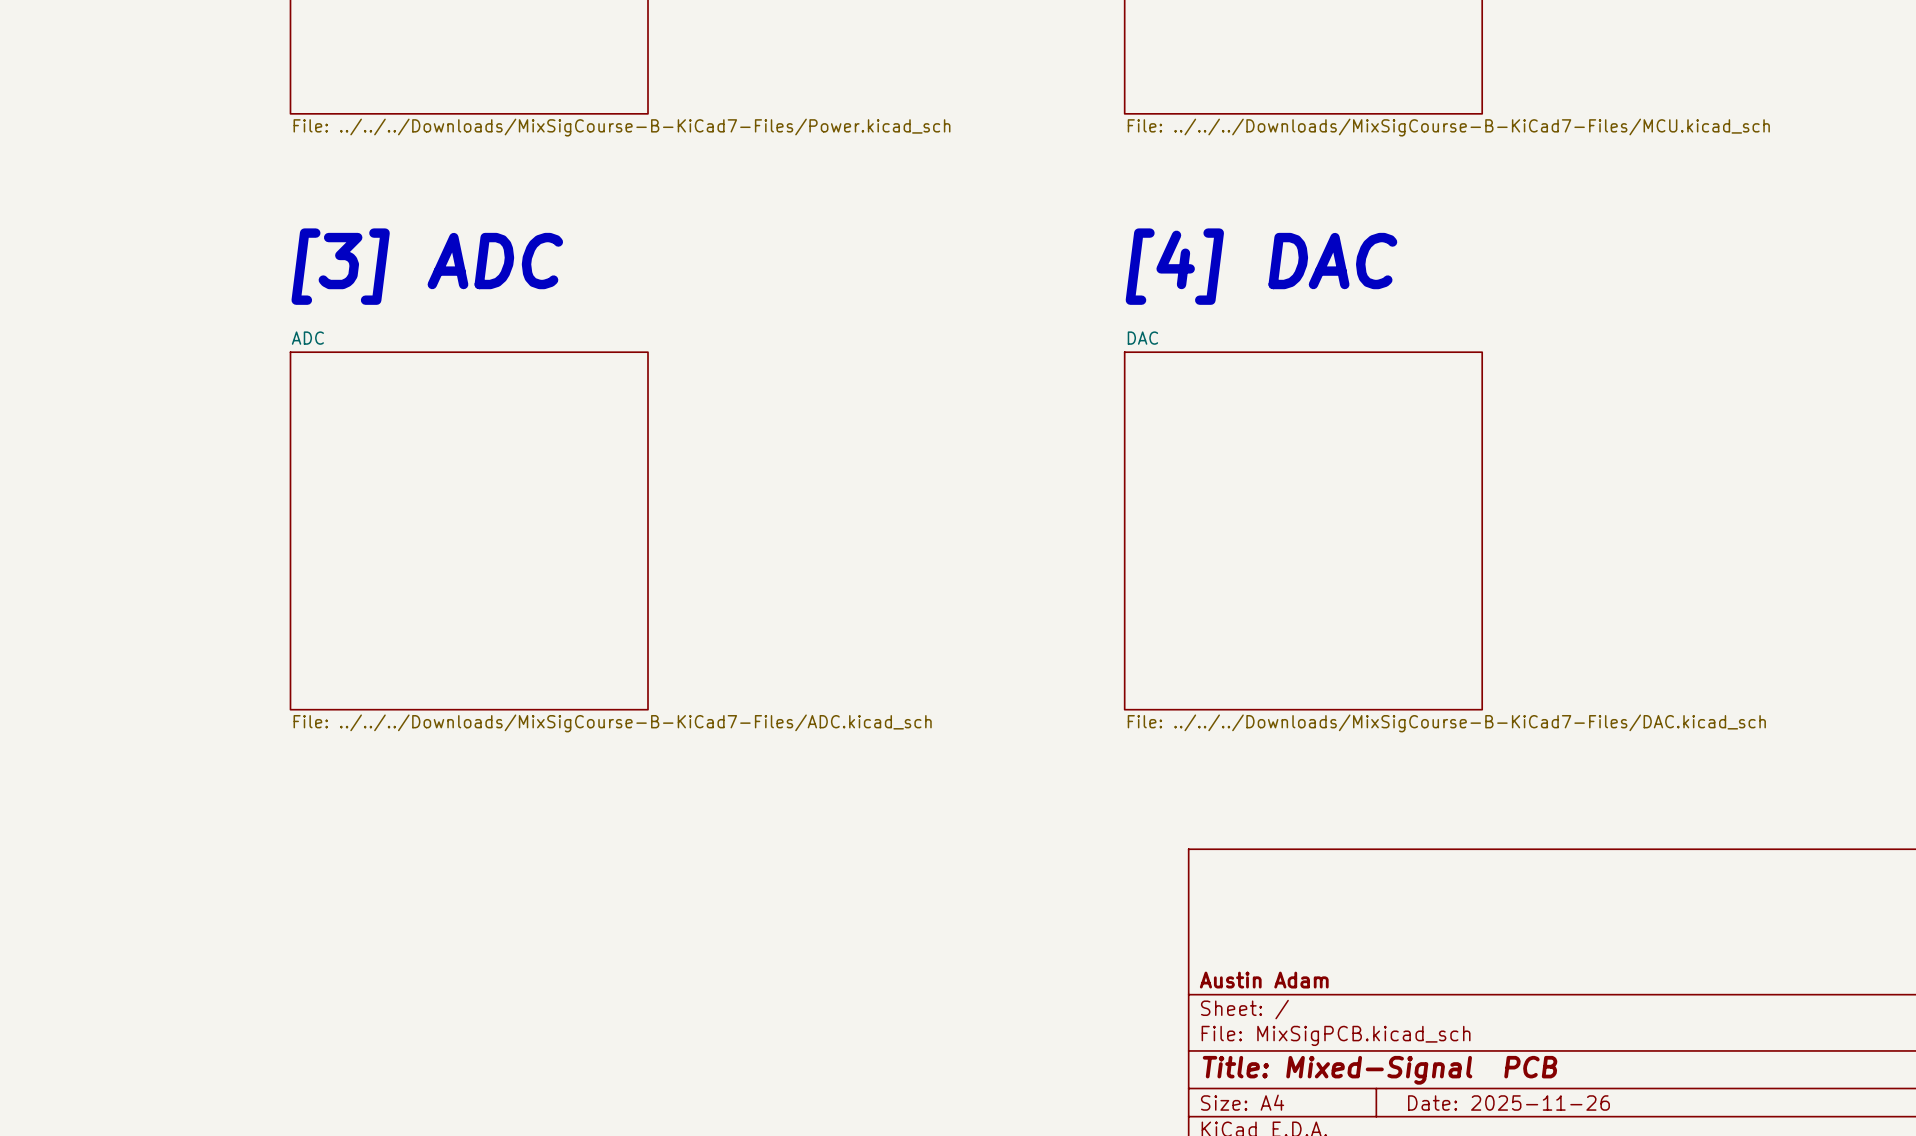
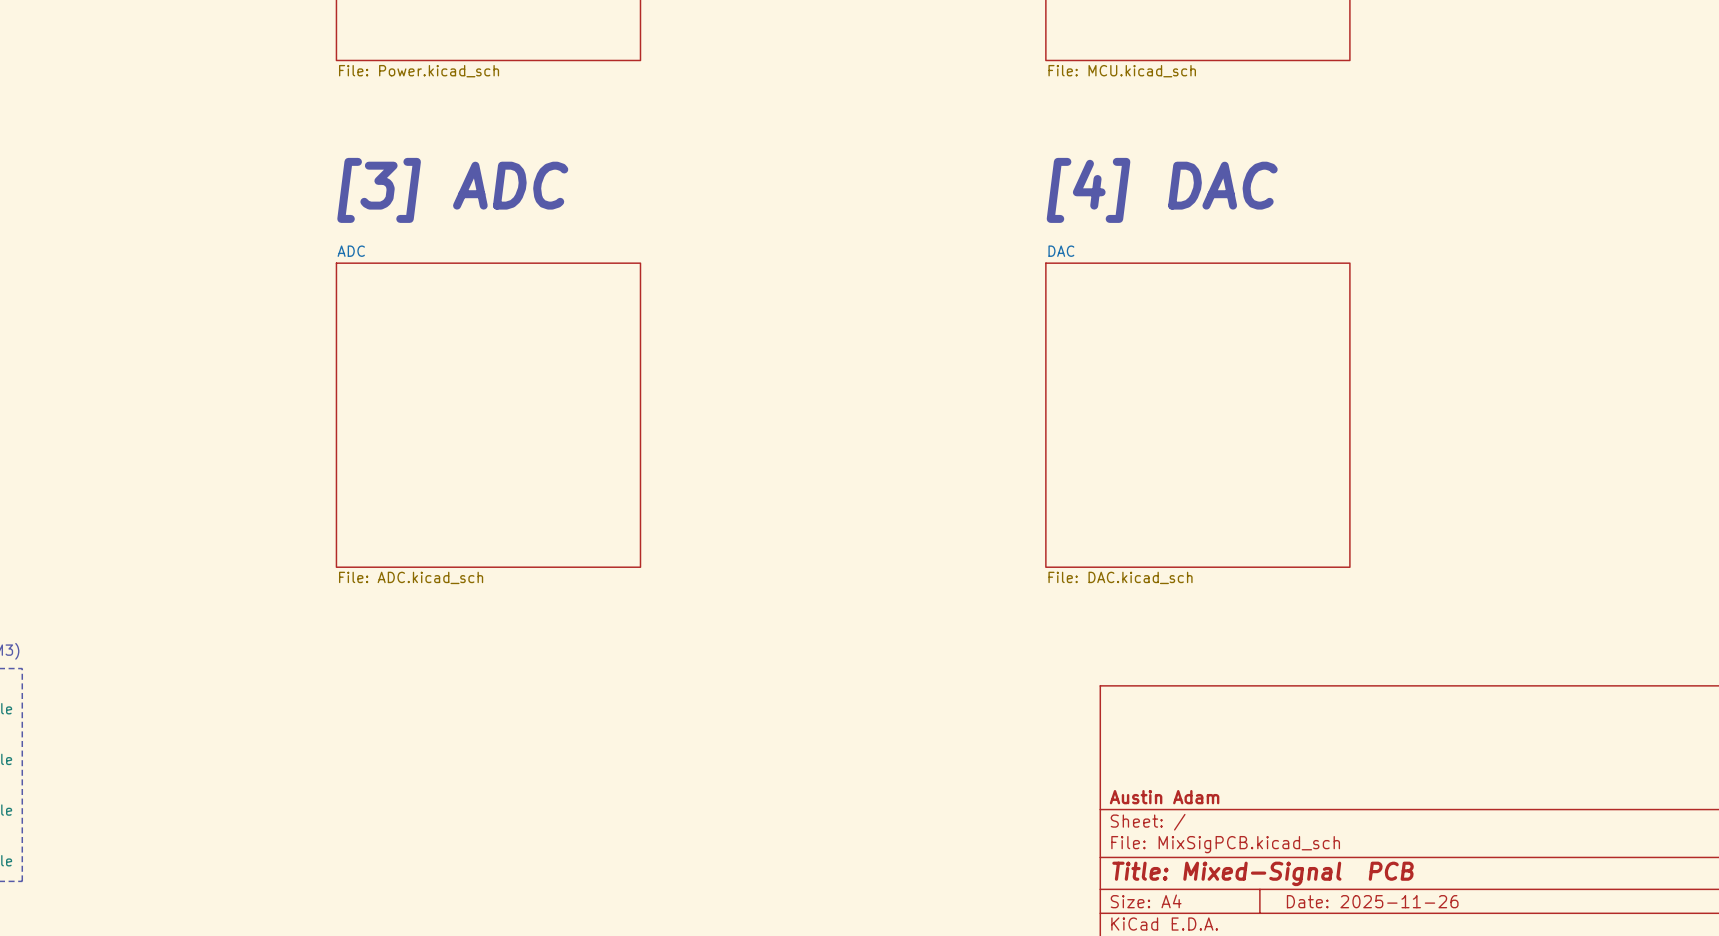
sheet value: File: ../../../Downloads/MixSigCourse-B-KiCad7-Files/Power.kicad_sch (621, 127) -> File: Power.kicad_sch (419, 71)
sheet value: File: ../../../Downloads/MixSigCourse-B-KiCad7-Files/MCU.kicad_sch (1448, 127) -> File: MCU.kicad_sch (1122, 71)
sheet ADC value: File: ../../../Downloads/MixSigCourse-B-KiCad7-Files/ADC.kicad_sch (612, 723) -> File: ADC.kicad_sch (411, 577)
sheet DAC value: File: ../../../Downloads/MixSigCourse-B-KiCad7-Files/DAC.kicad_sch (1446, 723) -> File: DAC.kicad_sch (1120, 577)

